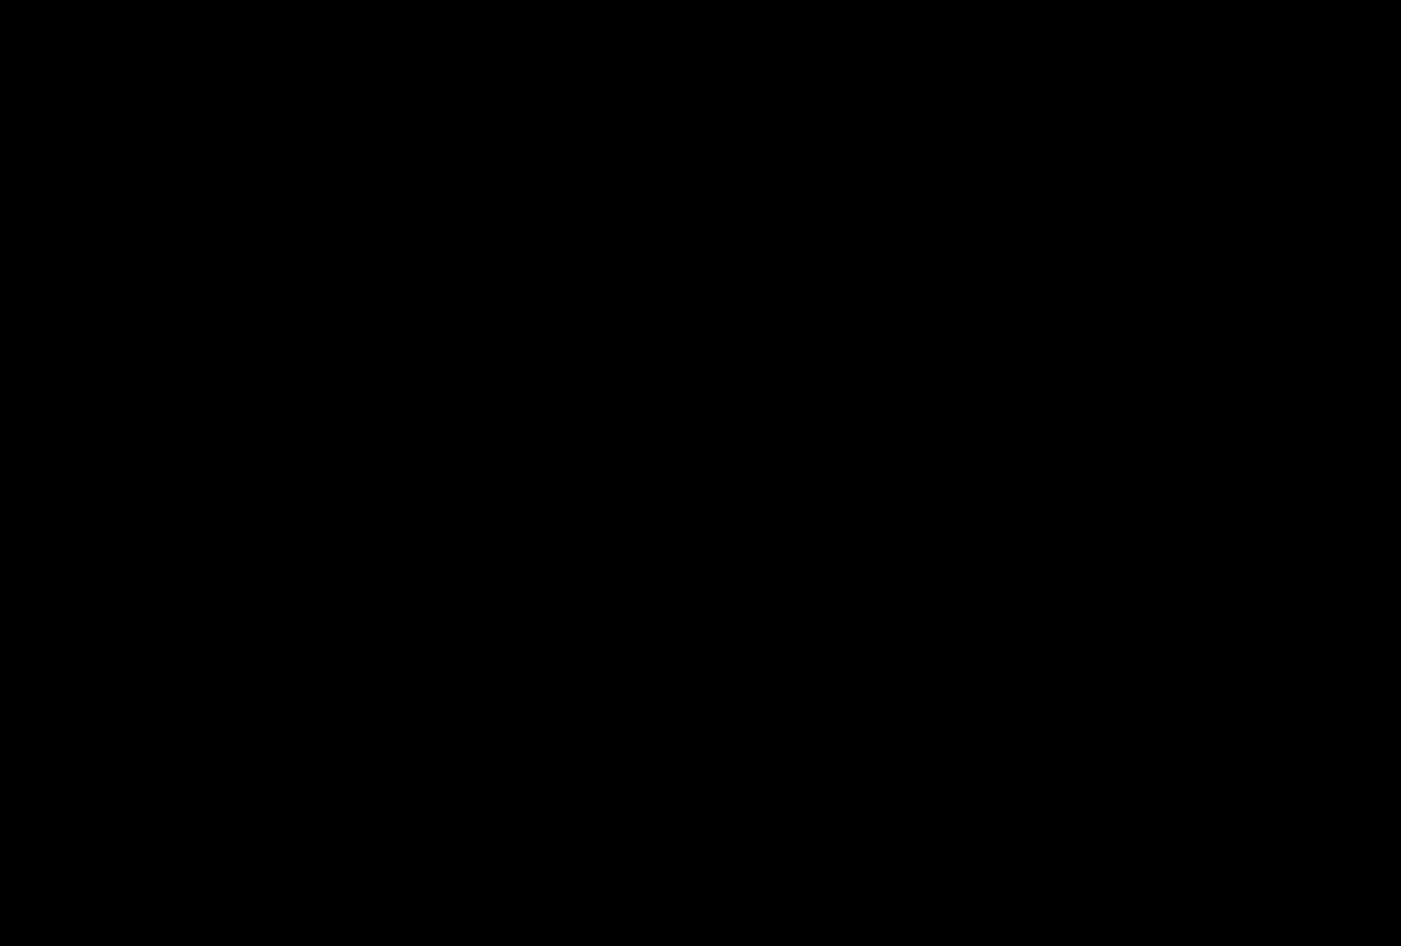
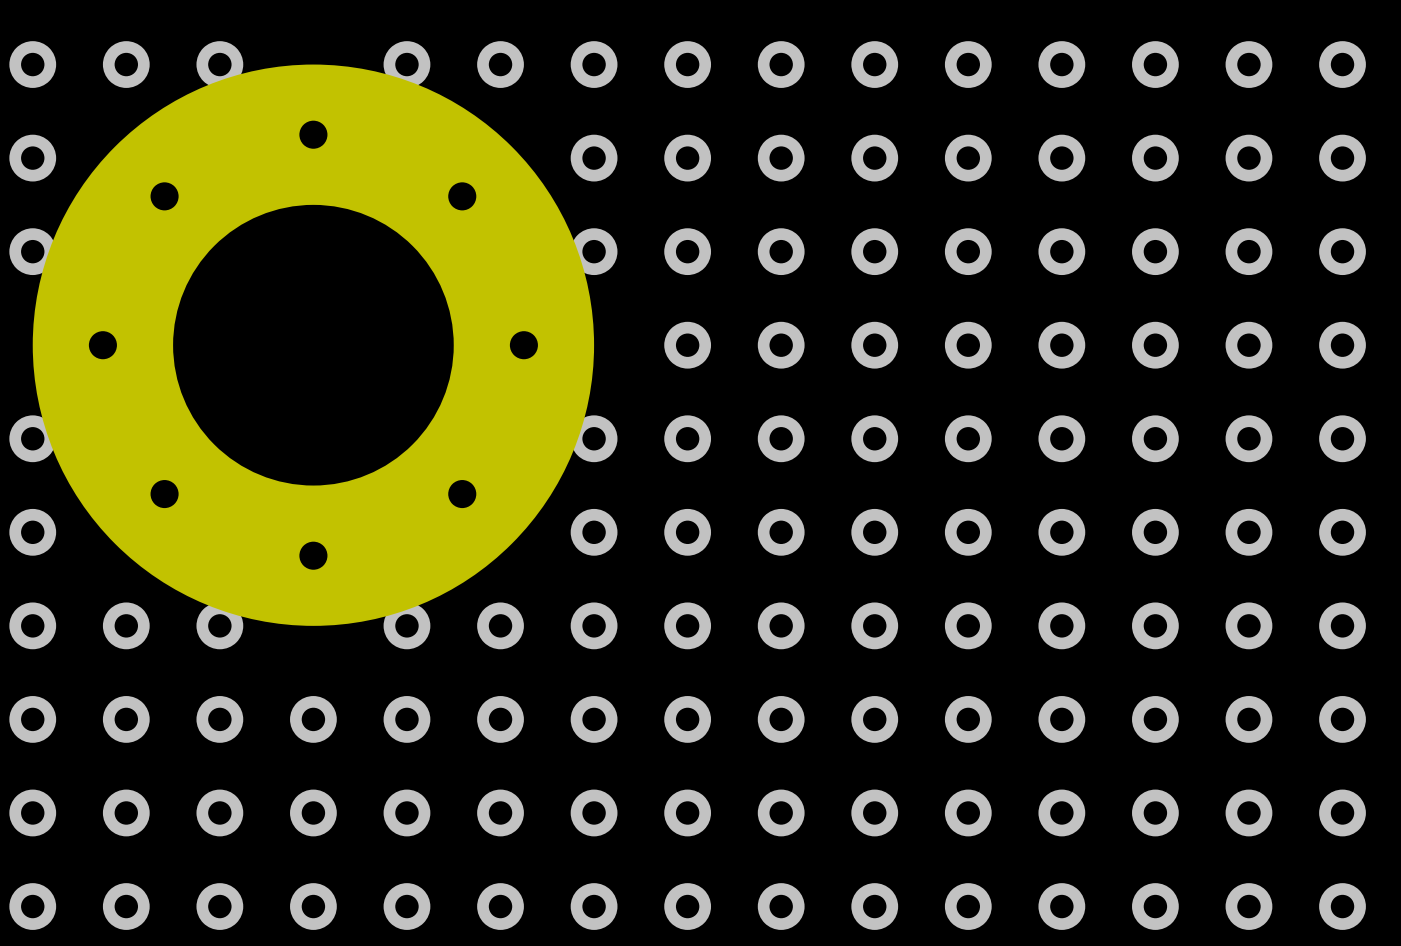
via: none -> (32, 64)
via: none -> (126, 64)
via: none -> (219, 64)
via: none -> (406, 64)
via: none -> (500, 64)
via: none -> (594, 64)
via: none -> (687, 64)
via: none -> (781, 64)
via: none -> (874, 64)
via: none -> (968, 64)
via: none -> (1061, 64)
via: none -> (1155, 64)
via: none -> (1248, 64)
via: none -> (1342, 64)
via: none -> (32, 158)
via: none -> (594, 158)
via: none -> (687, 158)
via: none -> (781, 158)
via: none -> (874, 158)
via: none -> (968, 158)
via: none -> (1061, 158)
via: none -> (1155, 158)
via: none -> (1248, 158)
via: none -> (1342, 158)
via: none -> (32, 251)
via: none -> (594, 251)
via: none -> (687, 251)
via: none -> (781, 251)
via: none -> (874, 251)
via: none -> (968, 251)
via: none -> (1061, 251)
via: none -> (1155, 251)
via: none -> (1248, 251)
via: none -> (1342, 251)
part: none -> (313, 345)
via: none -> (687, 345)
via: none -> (781, 345)
via: none -> (874, 345)
via: none -> (968, 345)
via: none -> (1061, 345)
via: none -> (1155, 345)
via: none -> (1248, 345)
via: none -> (1342, 345)
via: none -> (32, 438)
via: none -> (594, 438)
via: none -> (687, 438)
via: none -> (781, 438)
via: none -> (874, 438)
via: none -> (968, 438)
via: none -> (1061, 438)
via: none -> (1155, 438)
via: none -> (1248, 438)
via: none -> (1342, 438)
via: none -> (32, 532)
via: none -> (594, 532)
via: none -> (687, 532)
via: none -> (781, 532)
via: none -> (874, 532)
via: none -> (968, 532)
via: none -> (1061, 532)
via: none -> (1155, 532)
via: none -> (1248, 532)
via: none -> (1342, 532)
via: none -> (32, 625)
via: none -> (126, 625)
via: none -> (219, 625)
via: none -> (406, 625)
via: none -> (500, 625)
via: none -> (594, 625)
via: none -> (687, 625)
via: none -> (781, 625)
via: none -> (874, 625)
via: none -> (968, 625)
via: none -> (1061, 625)
via: none -> (1155, 625)
via: none -> (1248, 625)
via: none -> (1342, 625)
via: none -> (32, 719)
via: none -> (126, 719)
via: none -> (219, 719)
via: none -> (313, 719)
via: none -> (406, 719)
via: none -> (500, 719)
via: none -> (594, 719)
via: none -> (687, 719)
via: none -> (781, 719)
via: none -> (874, 719)
via: none -> (968, 719)
via: none -> (1061, 719)
via: none -> (1155, 719)
via: none -> (1248, 719)
via: none -> (1342, 719)
via: none -> (32, 812)
via: none -> (126, 812)
via: none -> (219, 812)
via: none -> (313, 812)
via: none -> (406, 812)
via: none -> (500, 812)
via: none -> (594, 812)
via: none -> (687, 812)
via: none -> (781, 812)
via: none -> (874, 812)
via: none -> (968, 812)
via: none -> (1061, 812)
via: none -> (1155, 812)
via: none -> (1248, 812)
via: none -> (1342, 812)
via: none -> (32, 906)
via: none -> (126, 906)
via: none -> (219, 906)
via: none -> (313, 906)
via: none -> (406, 906)
via: none -> (500, 906)
via: none -> (594, 906)
via: none -> (687, 906)
via: none -> (781, 906)
via: none -> (874, 906)
via: none -> (968, 906)
via: none -> (1061, 906)
via: none -> (1155, 906)
via: none -> (1248, 906)
via: none -> (1342, 906)

